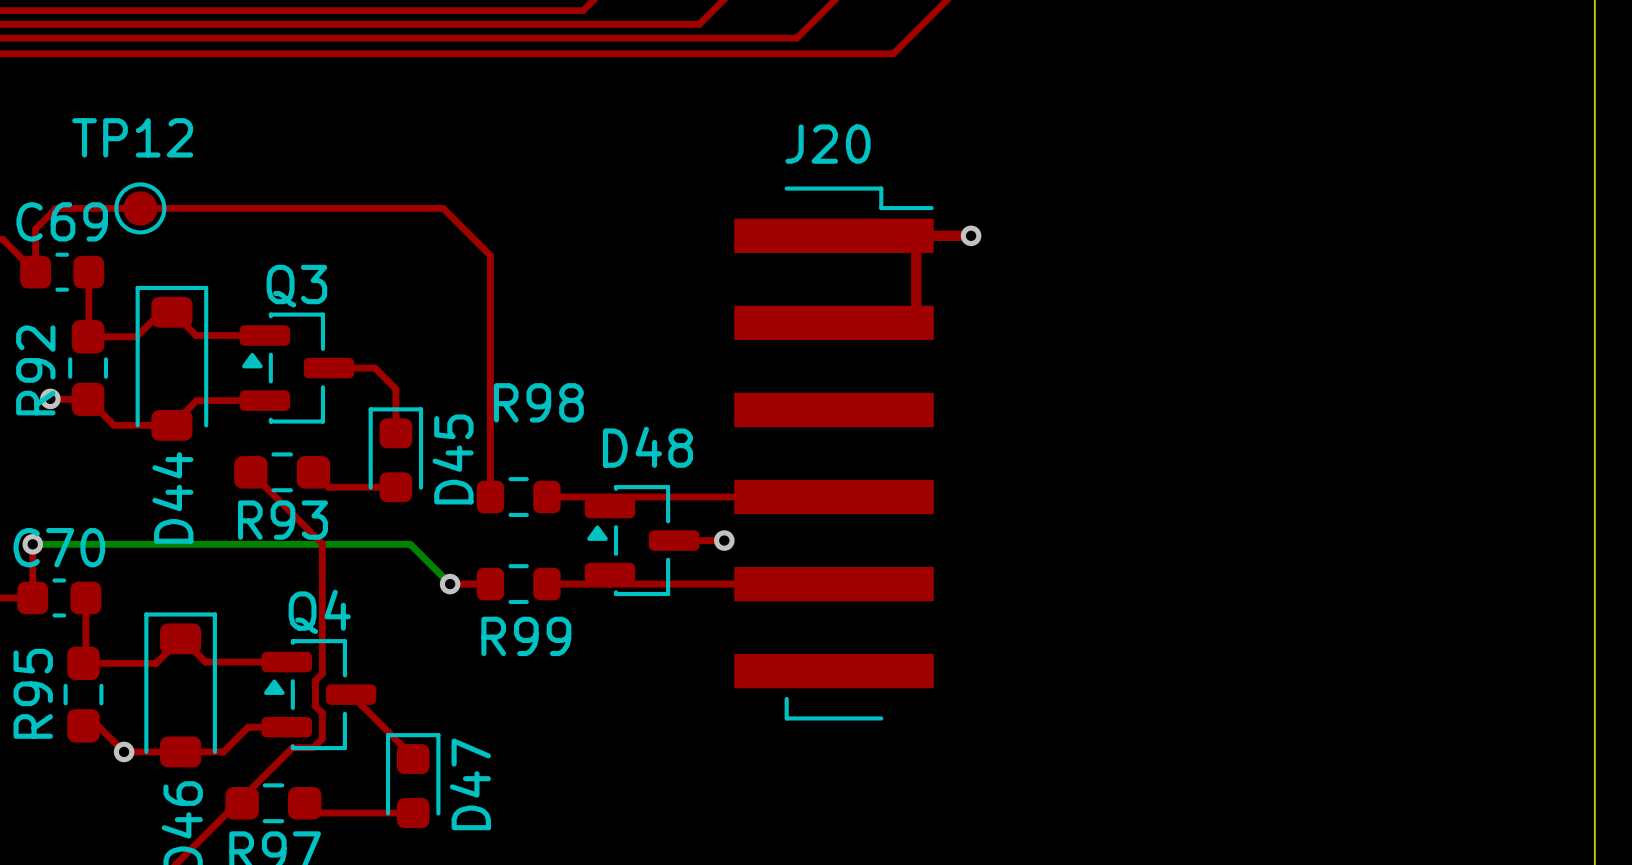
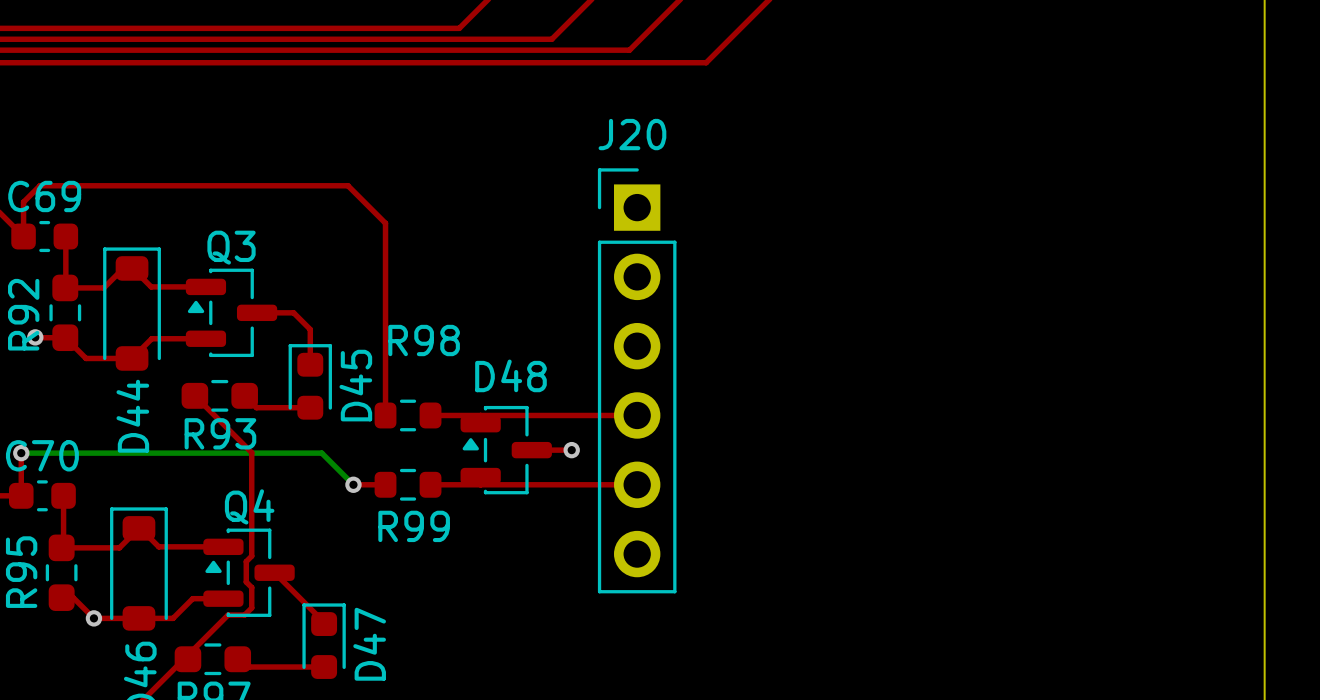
J20 footprint: [734, 186, 934, 721] -> [597, 168, 677, 594]
TP12: (140, 208) -> none
top track: (971, 235) (916, 235) (916, 322) -> none
via: (971, 235) -> none

